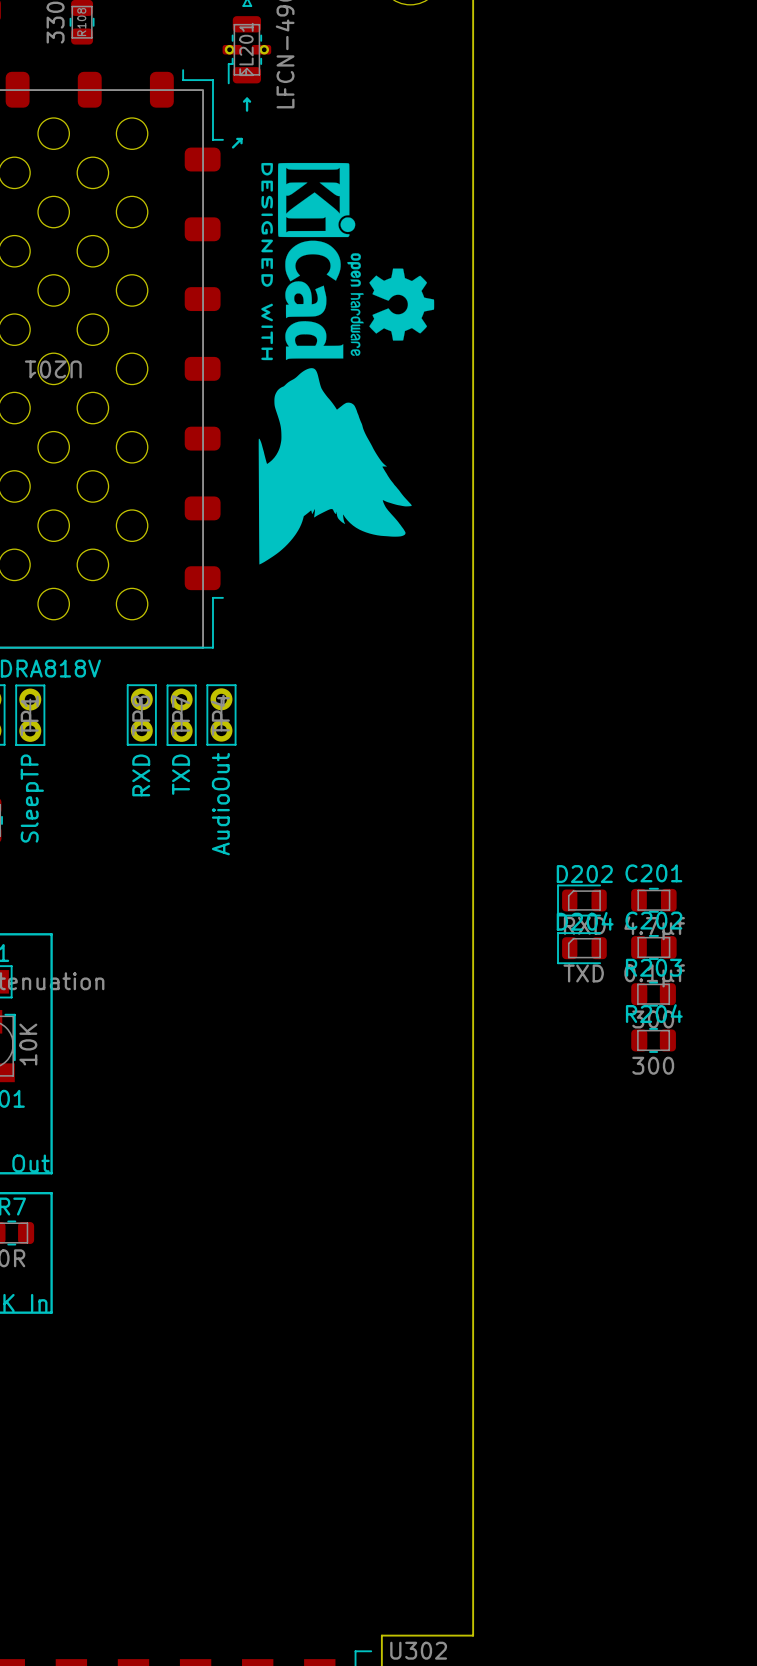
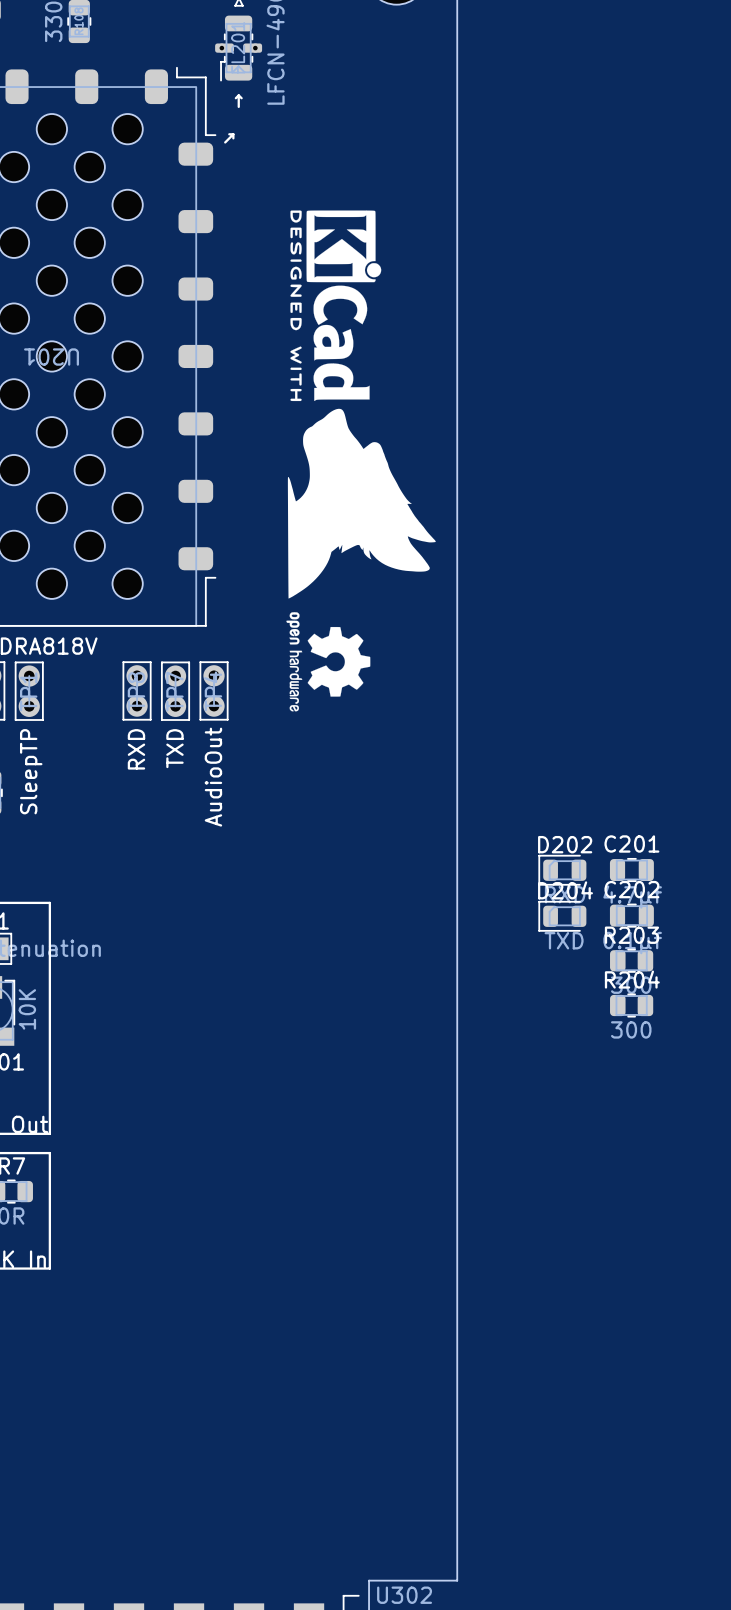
drawing position: (308, 261) -> (335, 305)
drawing position: (390, 304) -> (328, 661)
drawing position: (335, 466) -> (361, 503)

